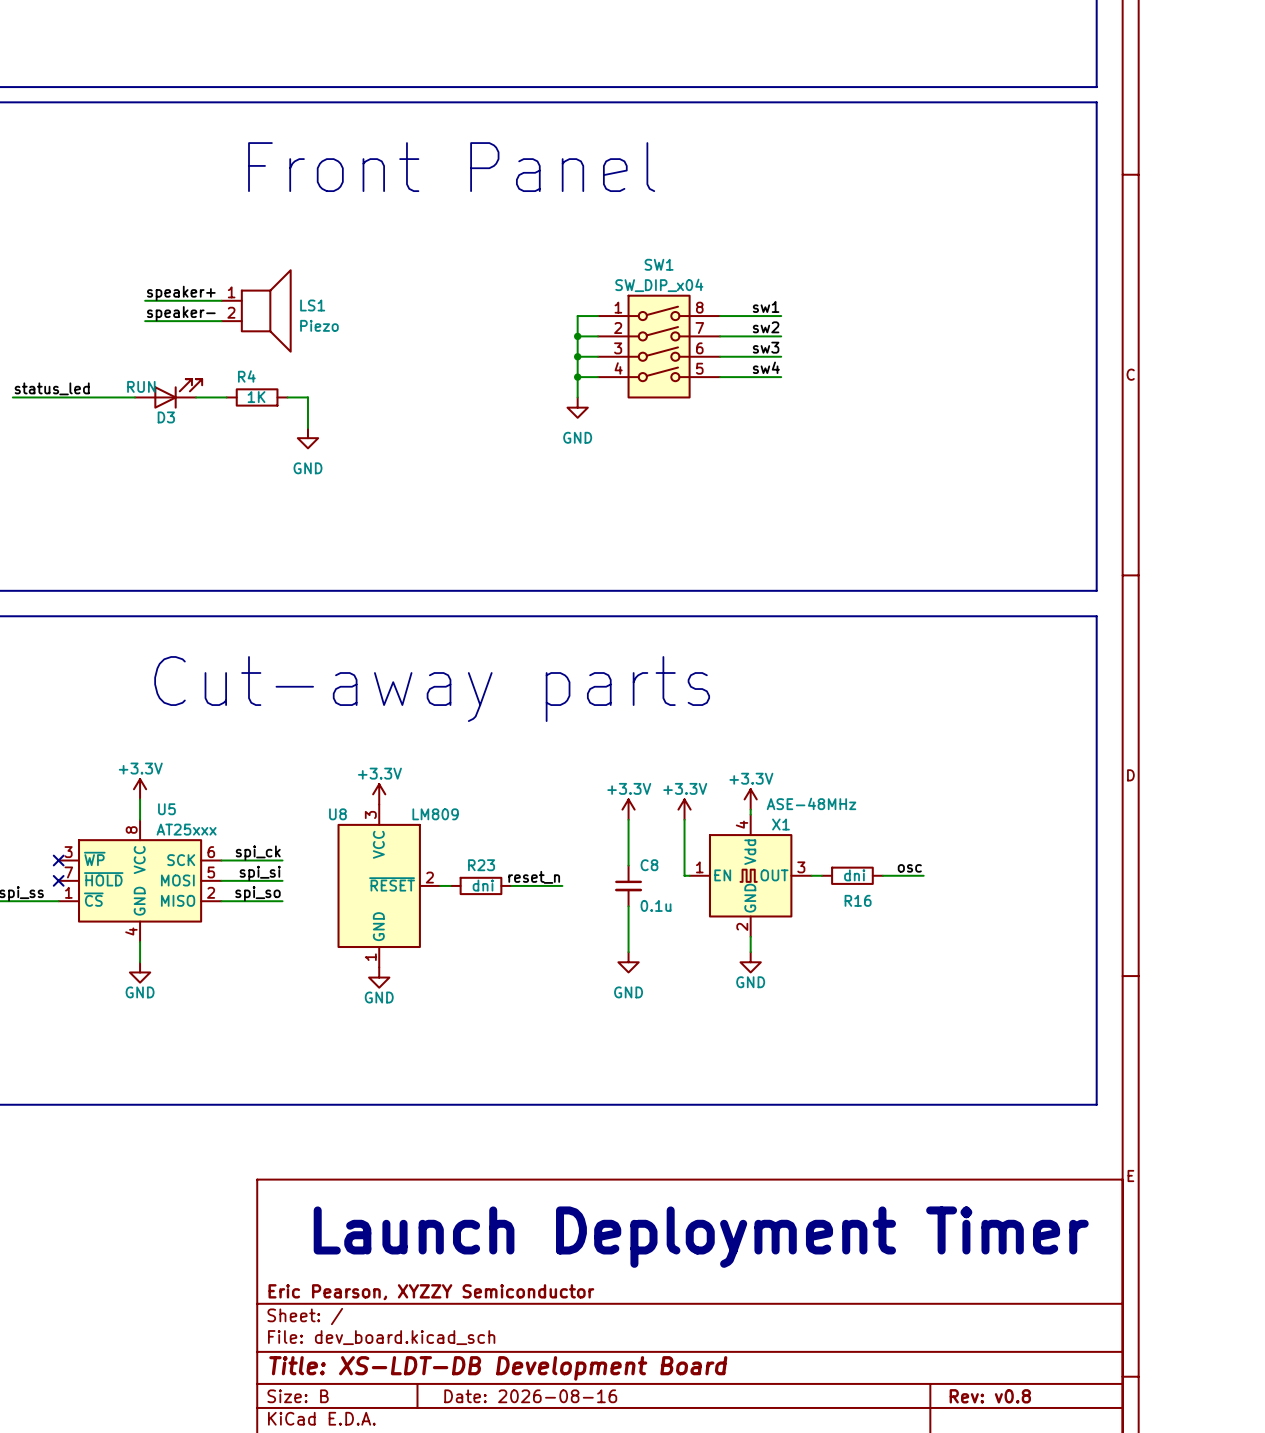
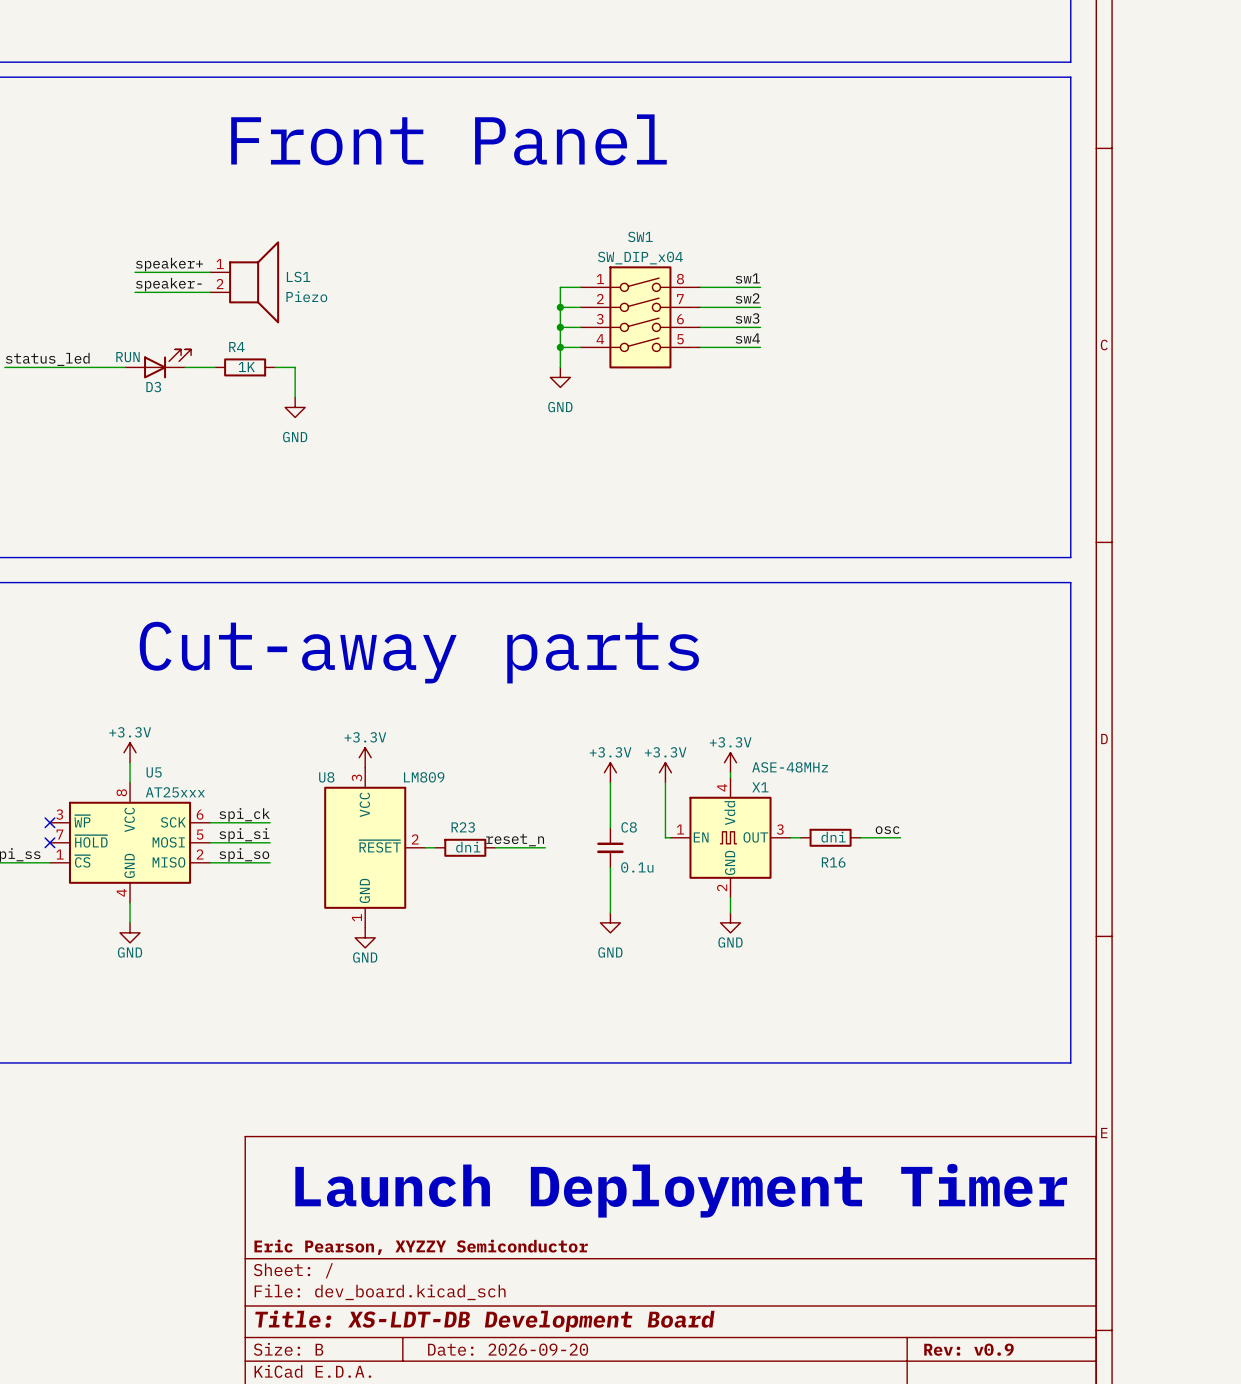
title block: Date: 2026-08-16 (530, 1396) -> Date: 2026-09-20 (508, 1349)
title block: Rev: v0.8 (990, 1396) -> Rev: v0.9 (968, 1349)

